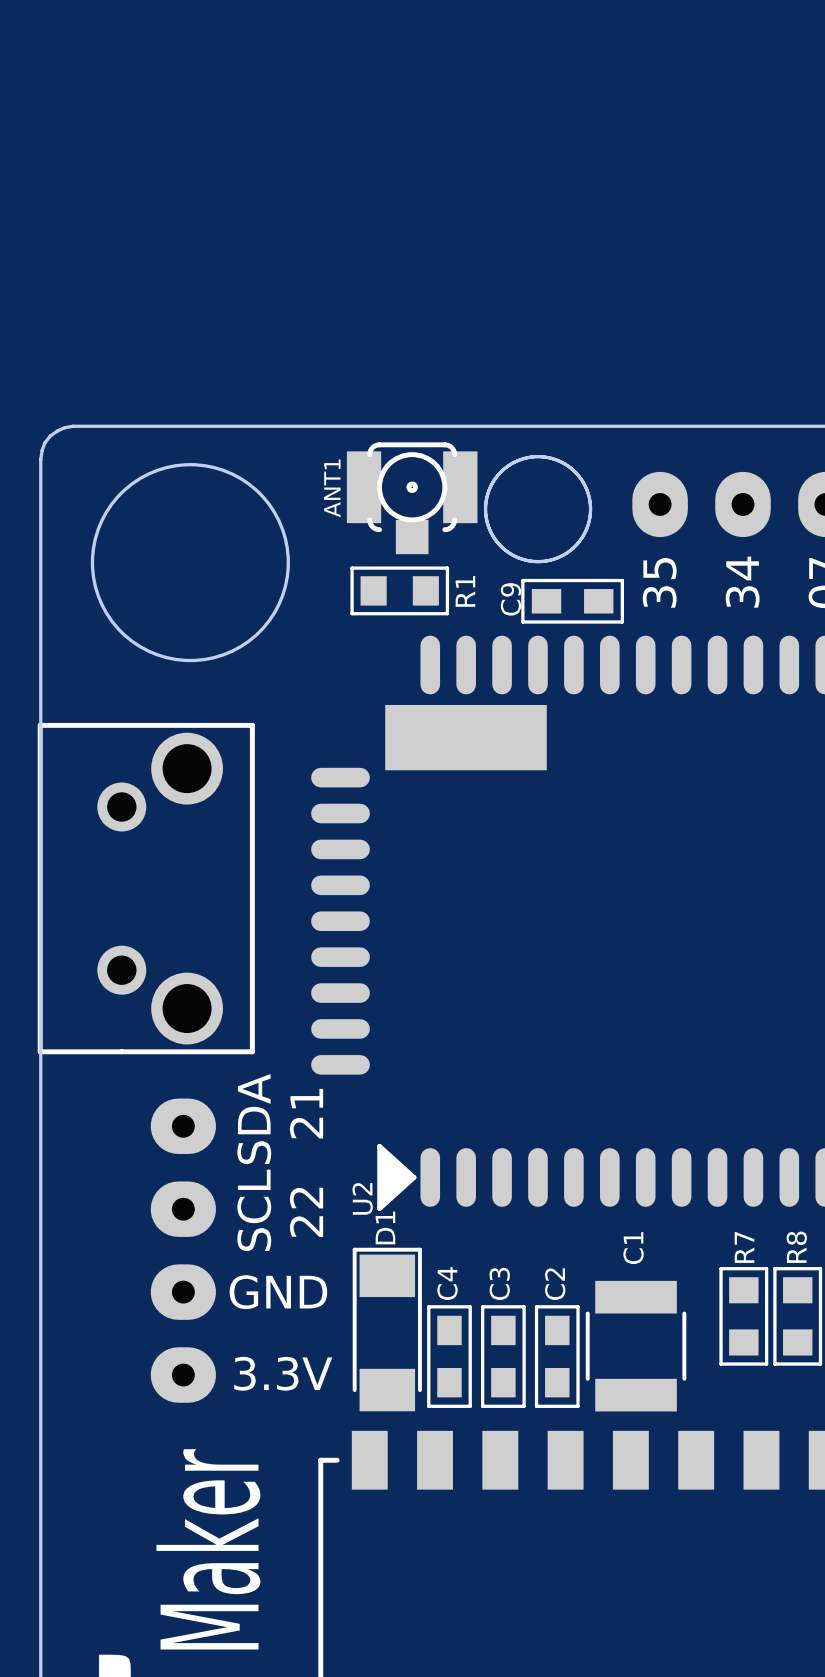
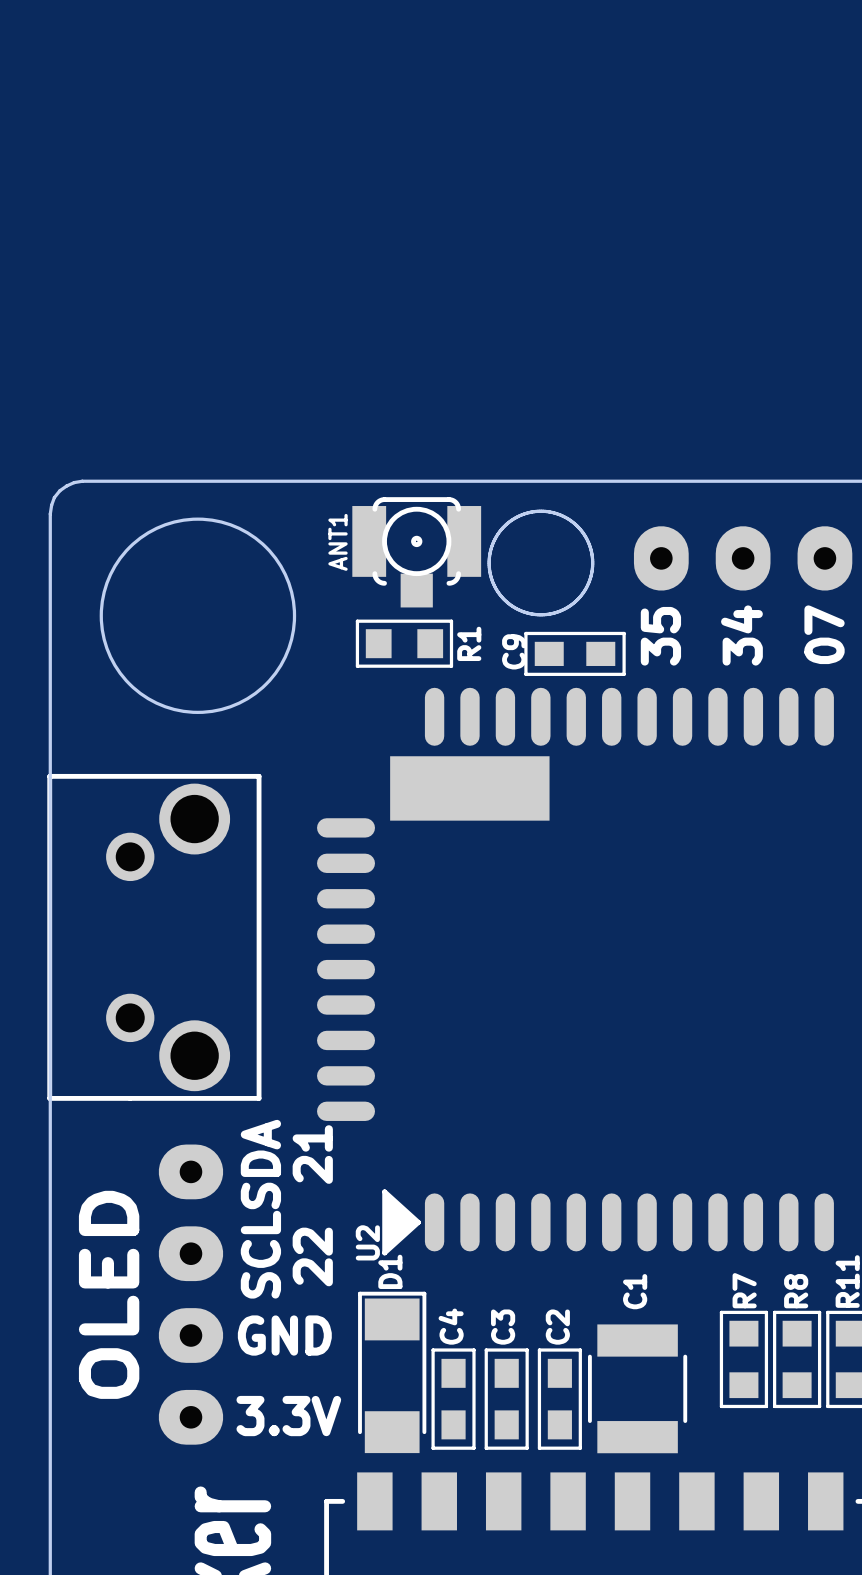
text: none -> OLED (109, 1294)

